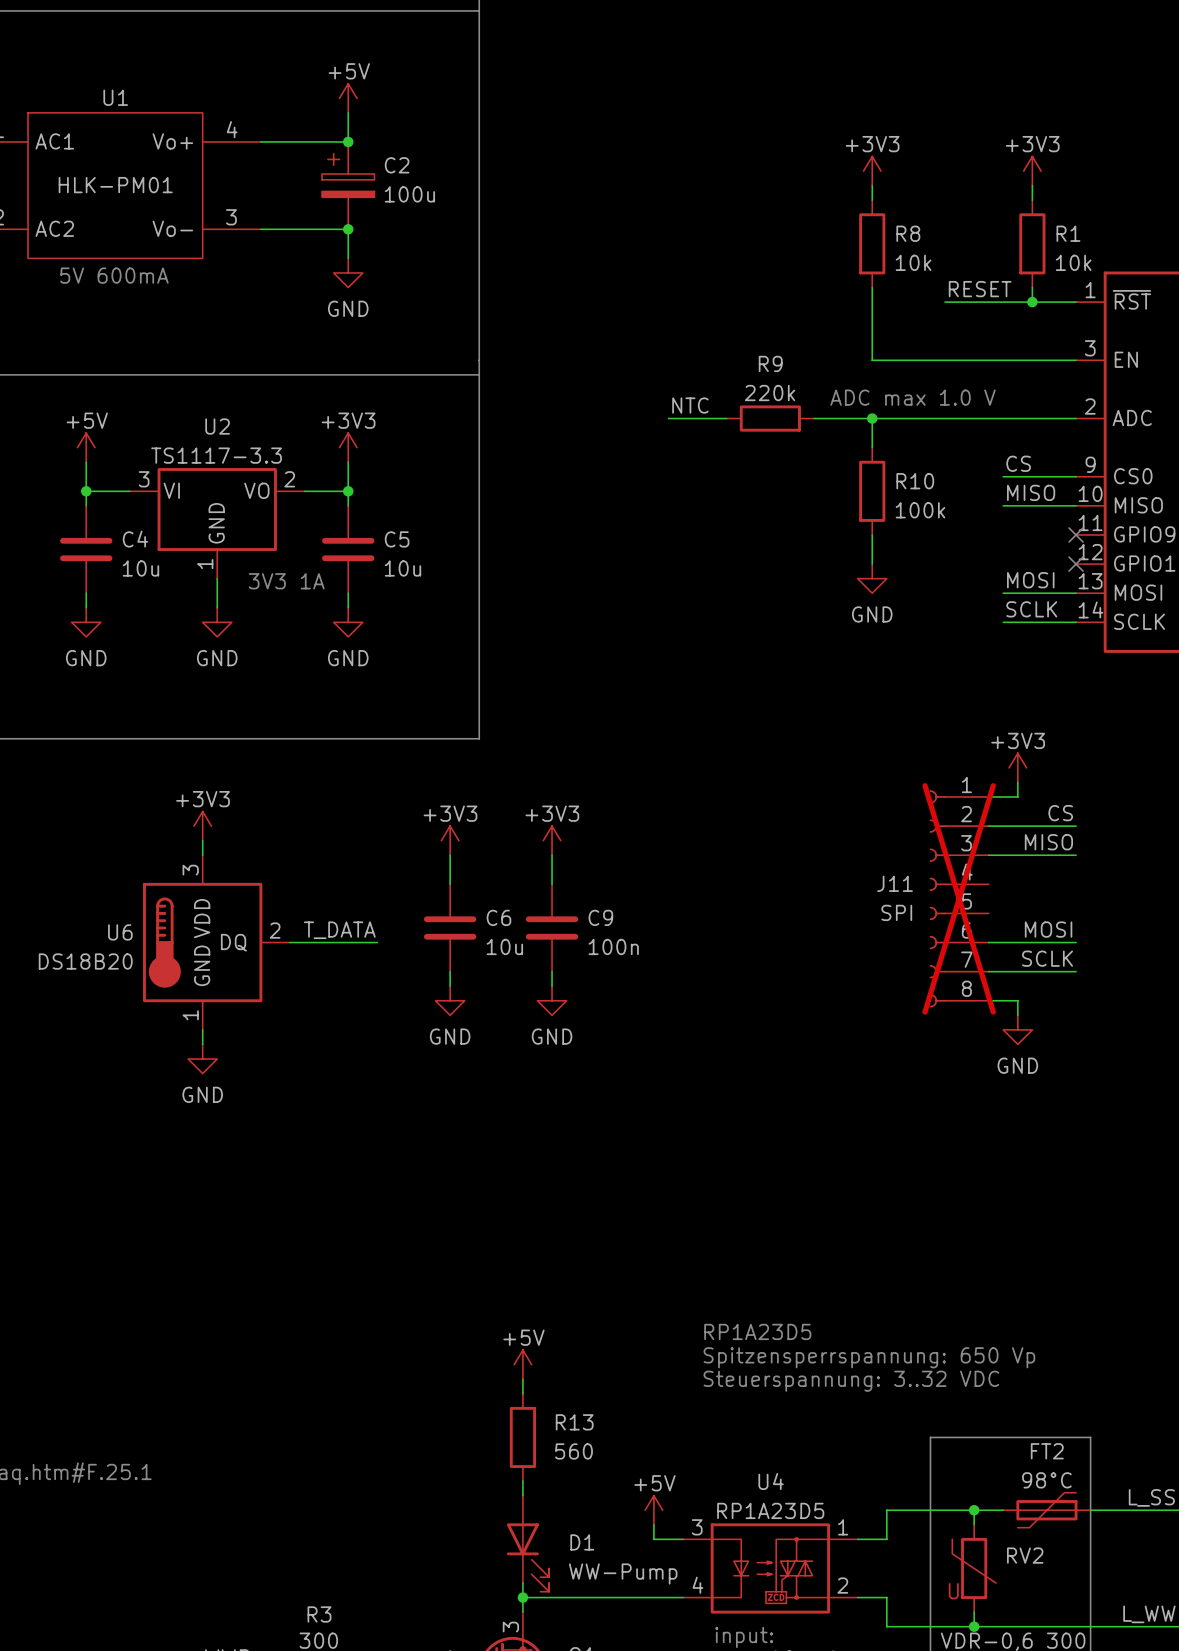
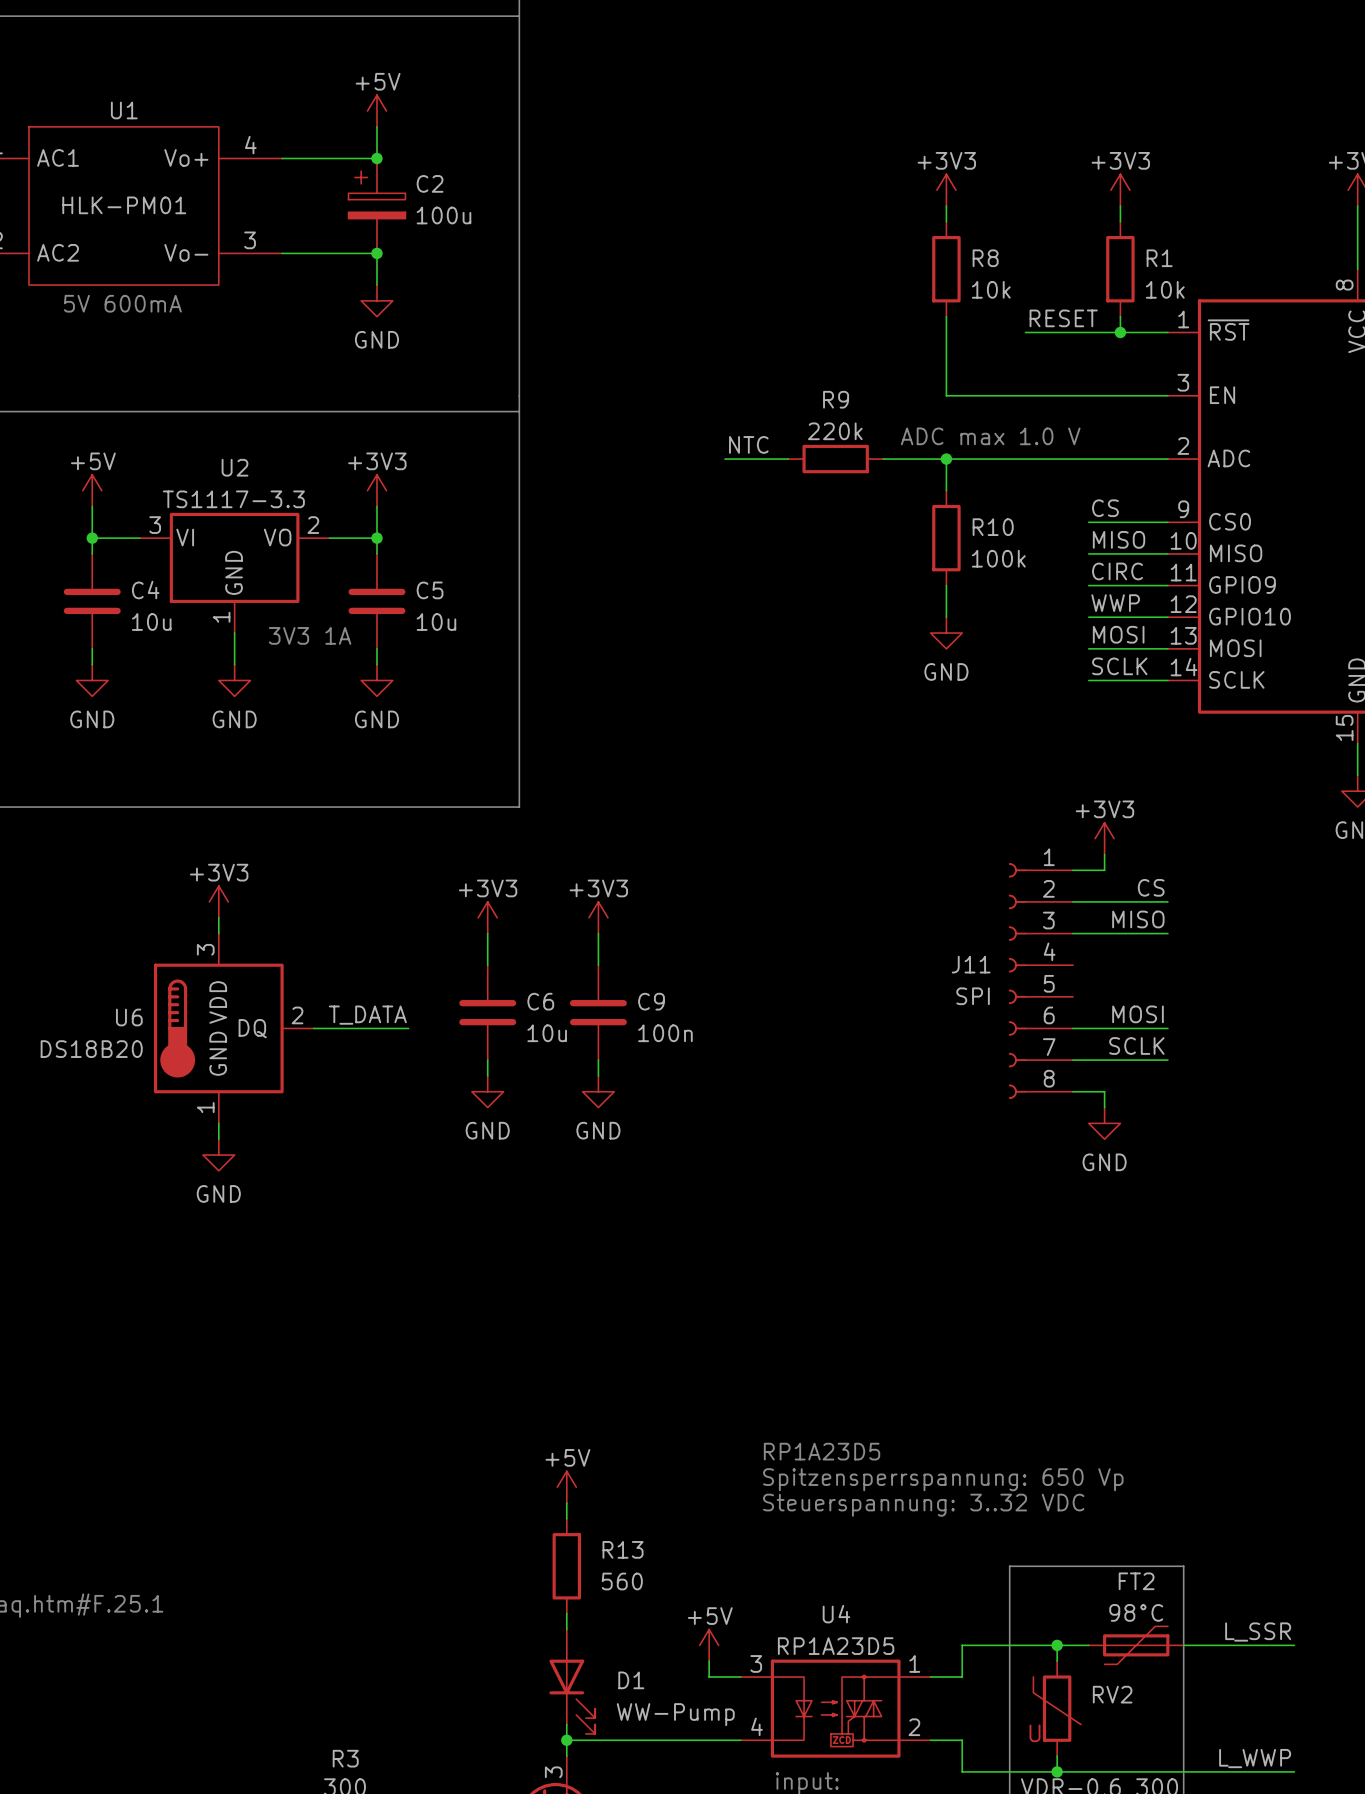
label: none -> CIRC (1117, 571)
wire: none -> (1088, 585) (1167, 585)
no-connect mark: (1076, 534) -> none
label: none -> WWP (1115, 603)
wire: none -> (1088, 617) (1167, 617)
no-connect mark: (1076, 564) -> none
J11 do-not-place cross: (959, 898) -> none

